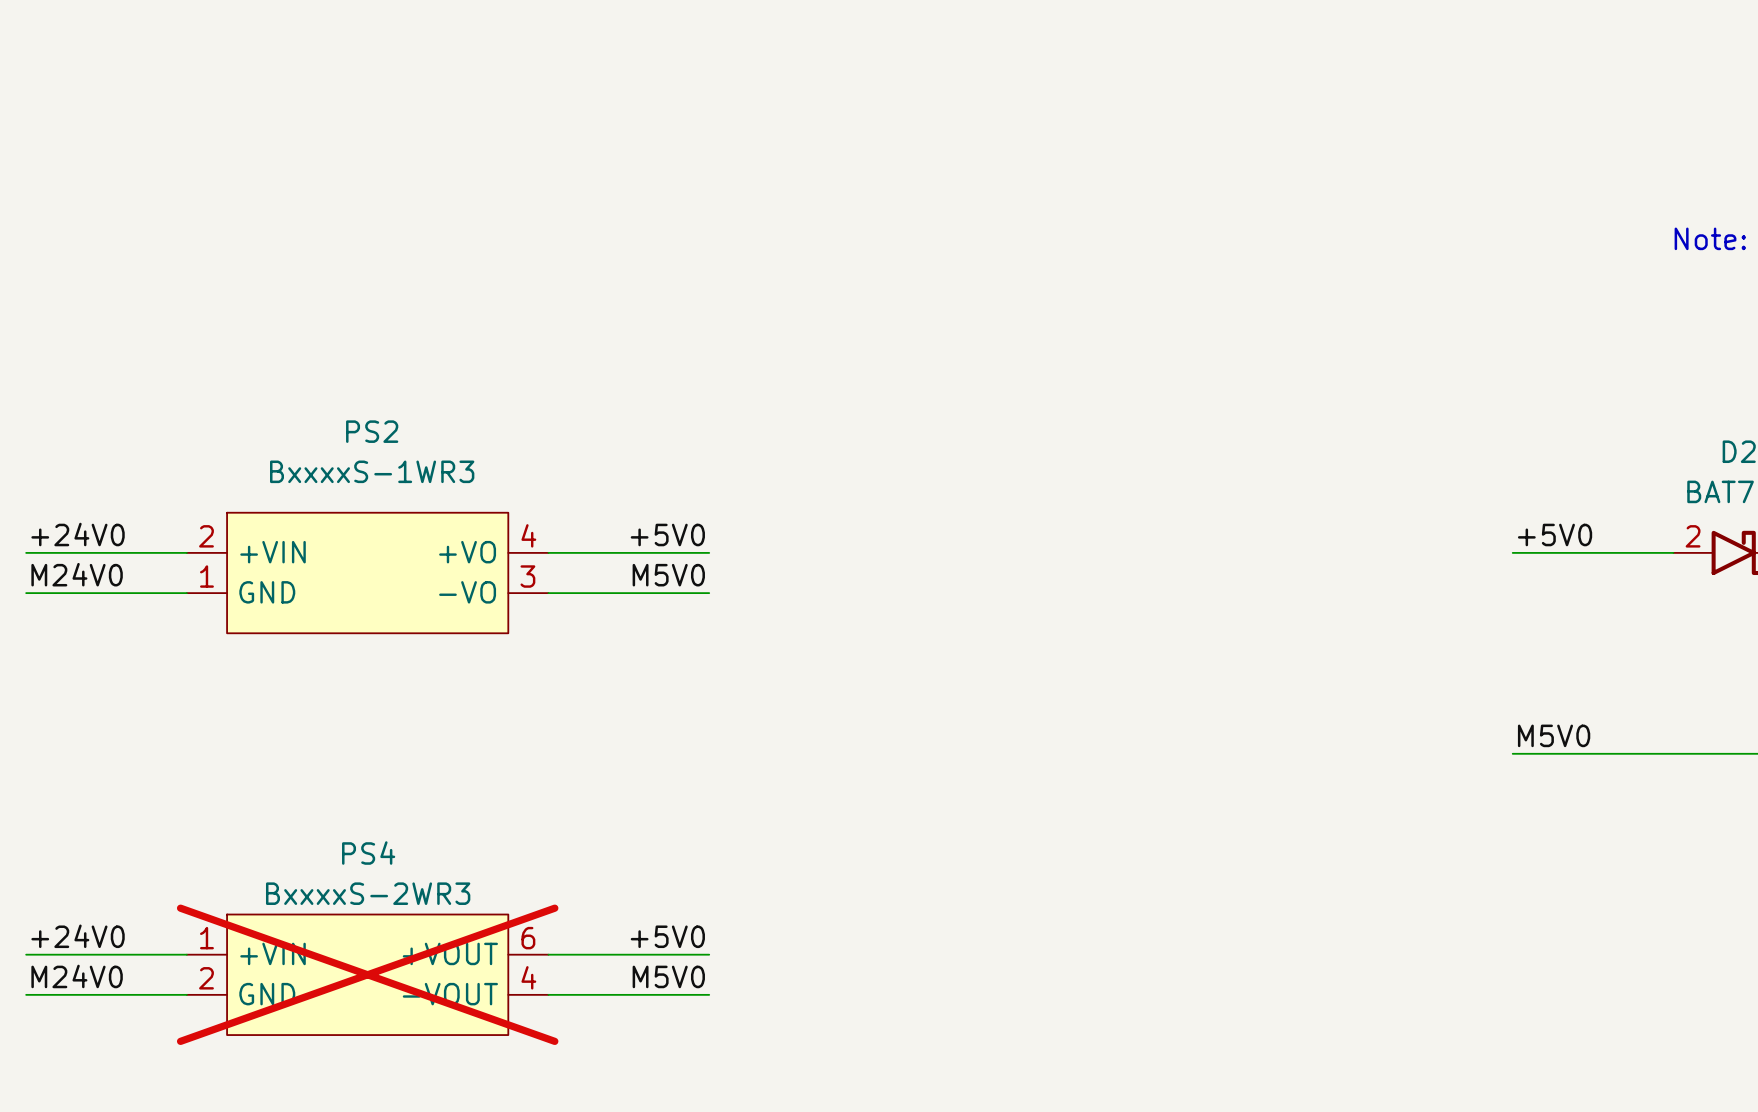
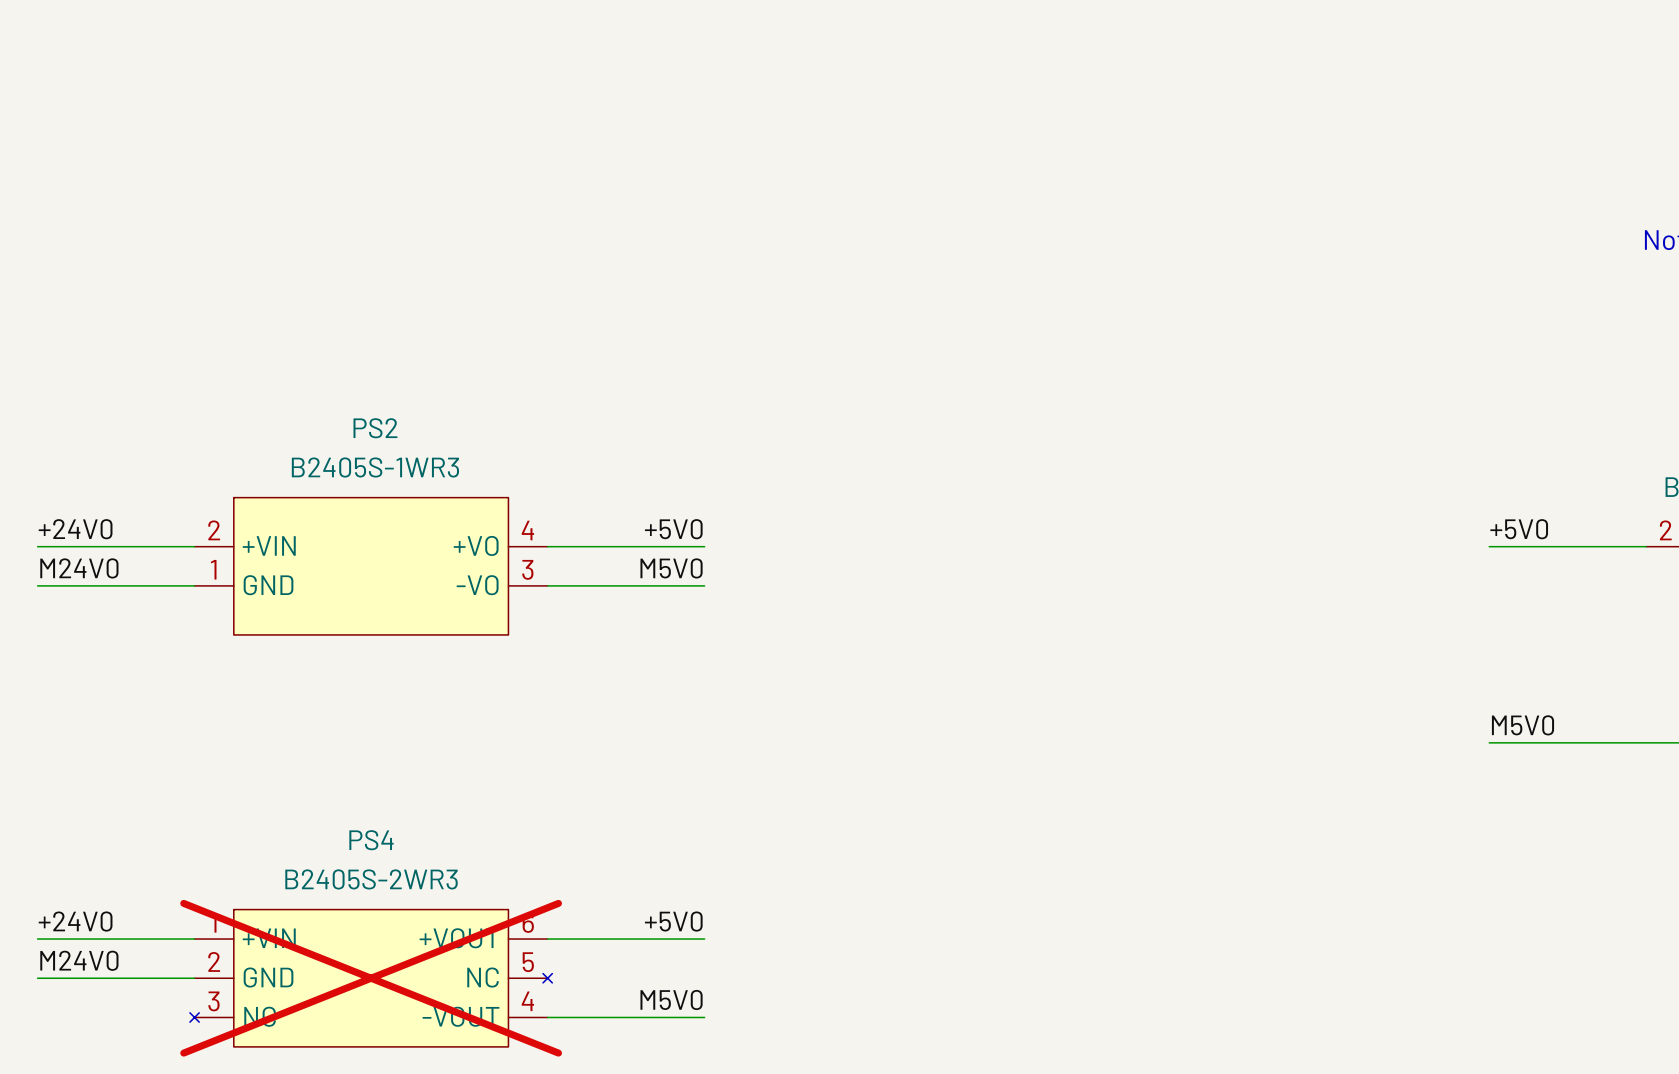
PS2 value: BxxxxS-1WR3 (372, 471) -> B2405S-1WR3 (375, 467)
PS2 symbol: [186, 512, 549, 634] -> [194, 497, 548, 635]
PS4 value: BxxxxS-2WR3 (368, 893) -> B2405S-2WR3 (371, 879)
PS4 symbol: [186, 914, 549, 1036] -> [189, 909, 553, 1047]
label position: M5V0 (668, 976) -> M5V0 (671, 999)
wire: (548, 994) (709, 994) -> (547, 1017) (704, 1017)

